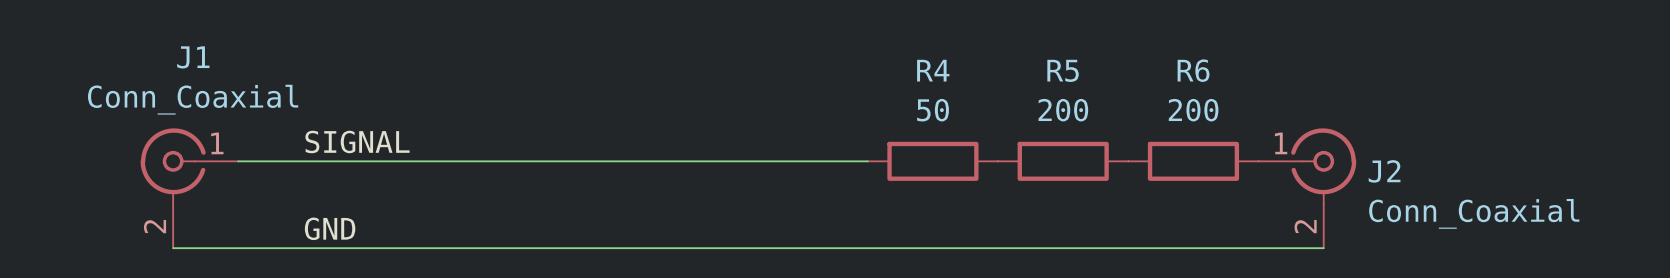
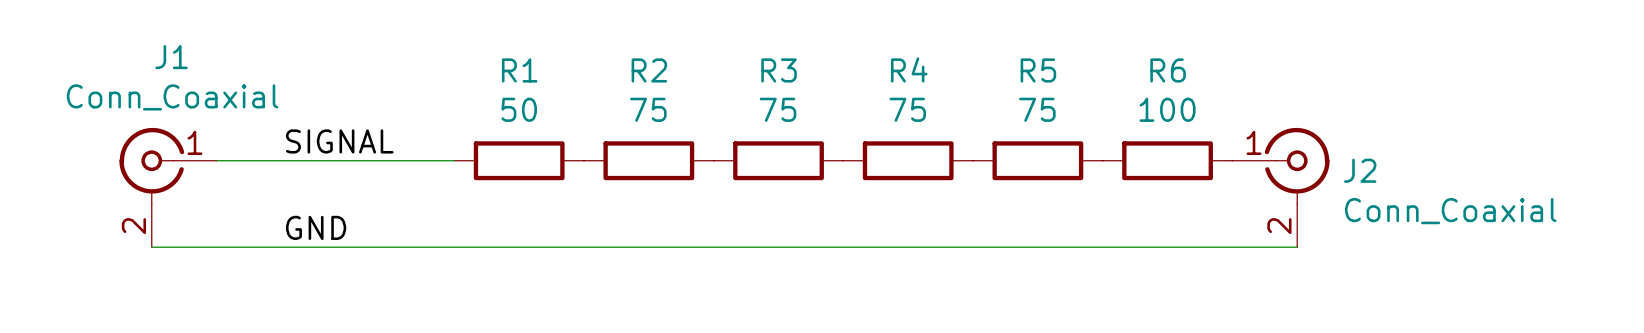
R4 value: 50 (933, 110) -> 75 (907, 109)
R5 value: 200 (1063, 110) -> 75 (1037, 109)
R6 value: 200 (1193, 110) -> 100 (1167, 109)
wire: (477, 161) (867, 161) -> none
R1: none -> 50 (519, 160)
R2: none -> 75 (648, 160)
R3: none -> 75 (778, 160)

